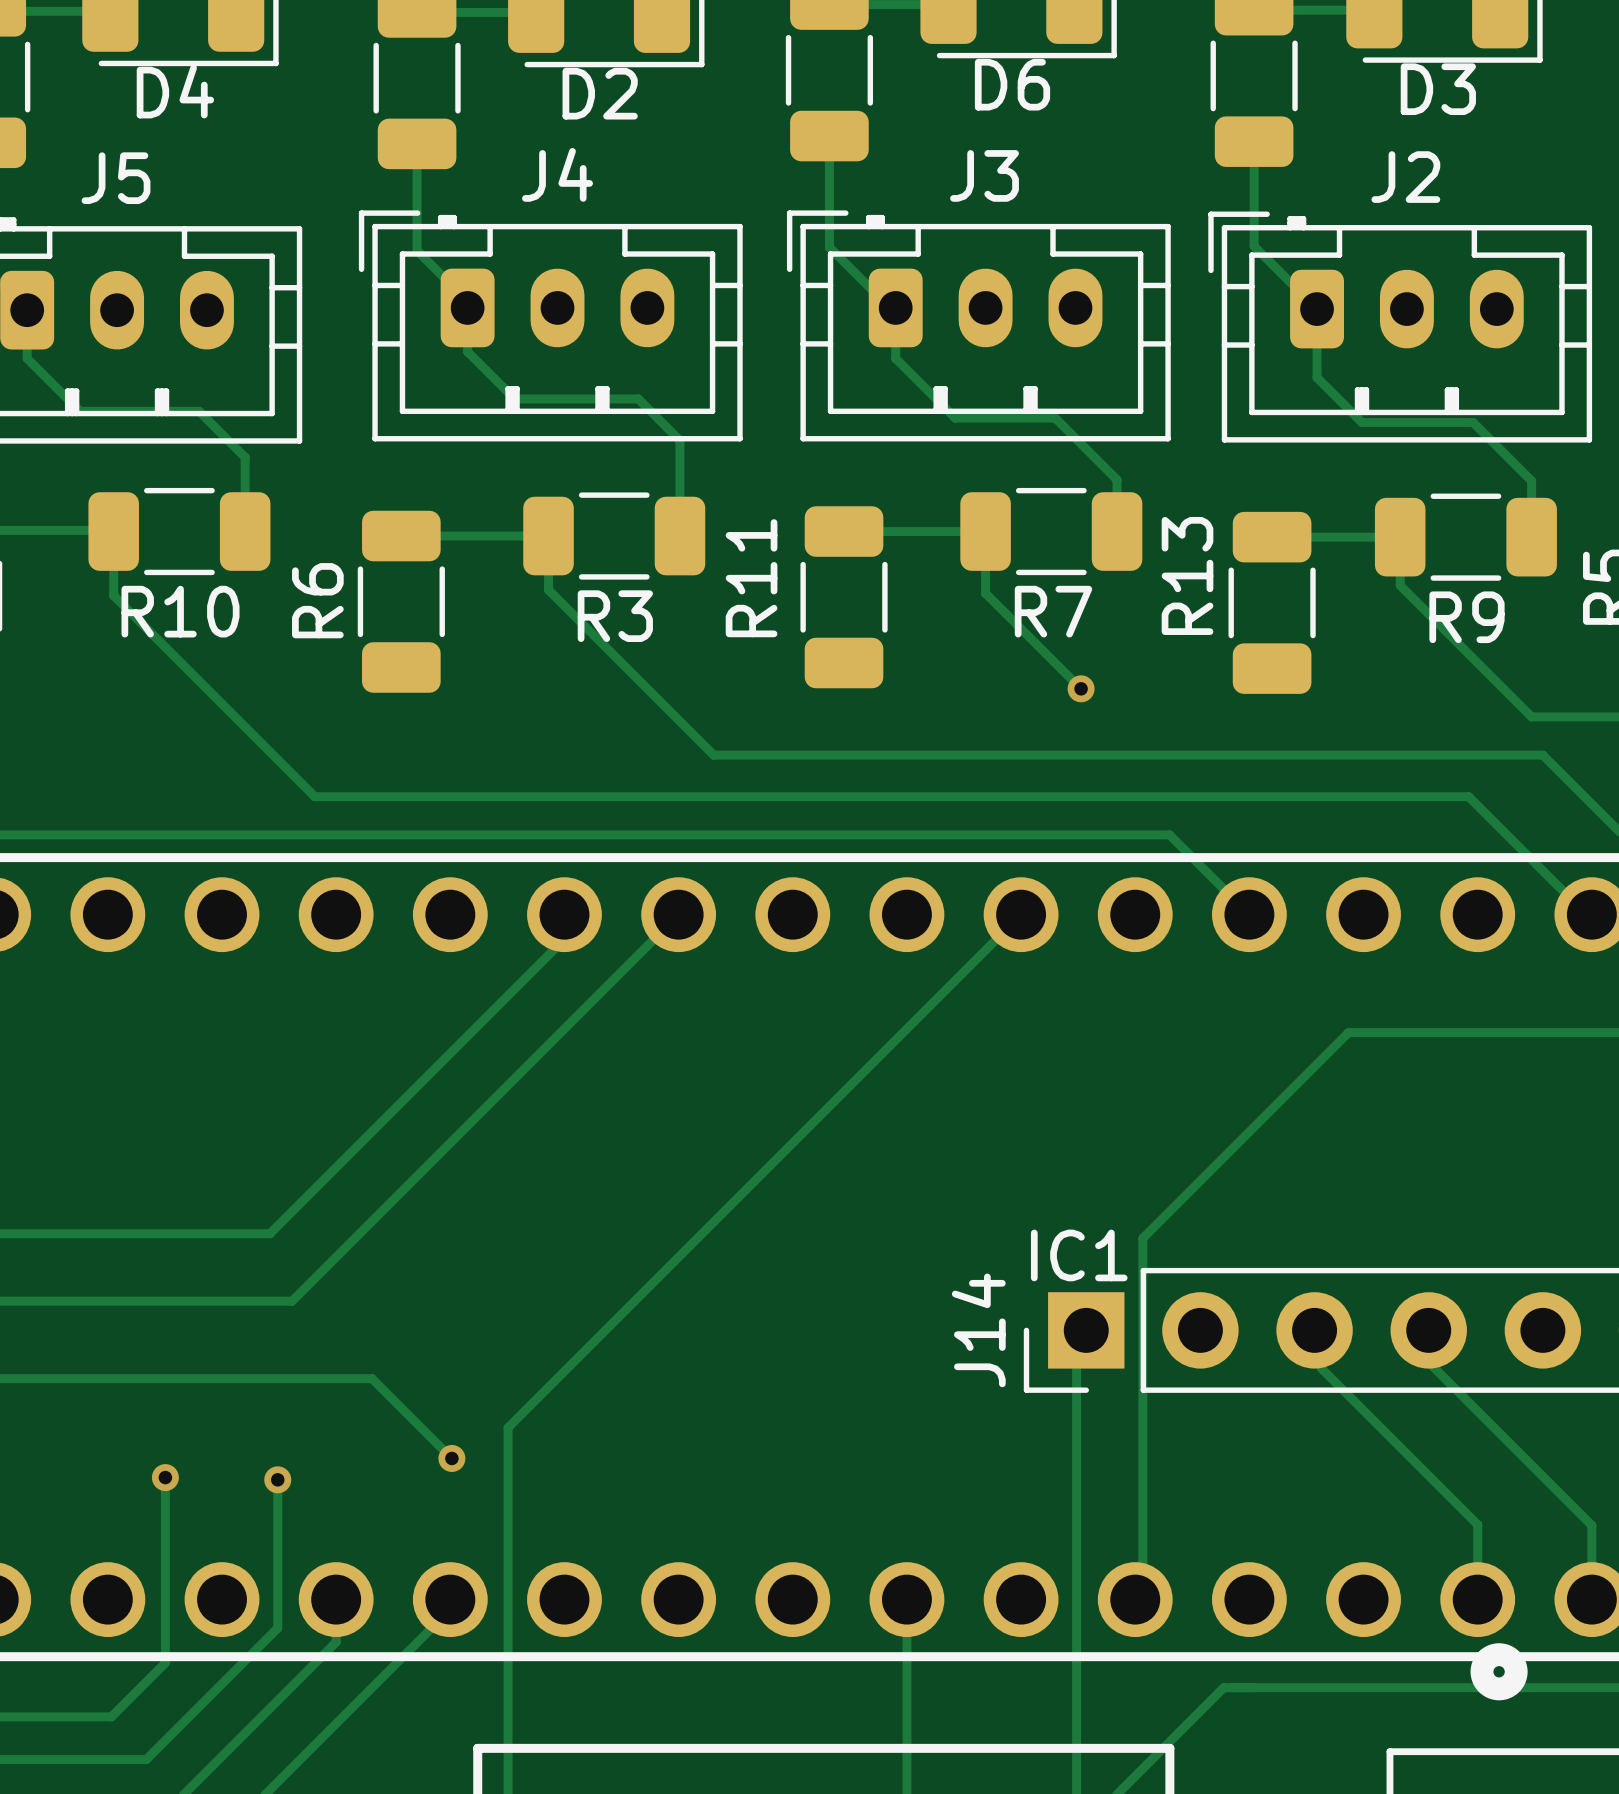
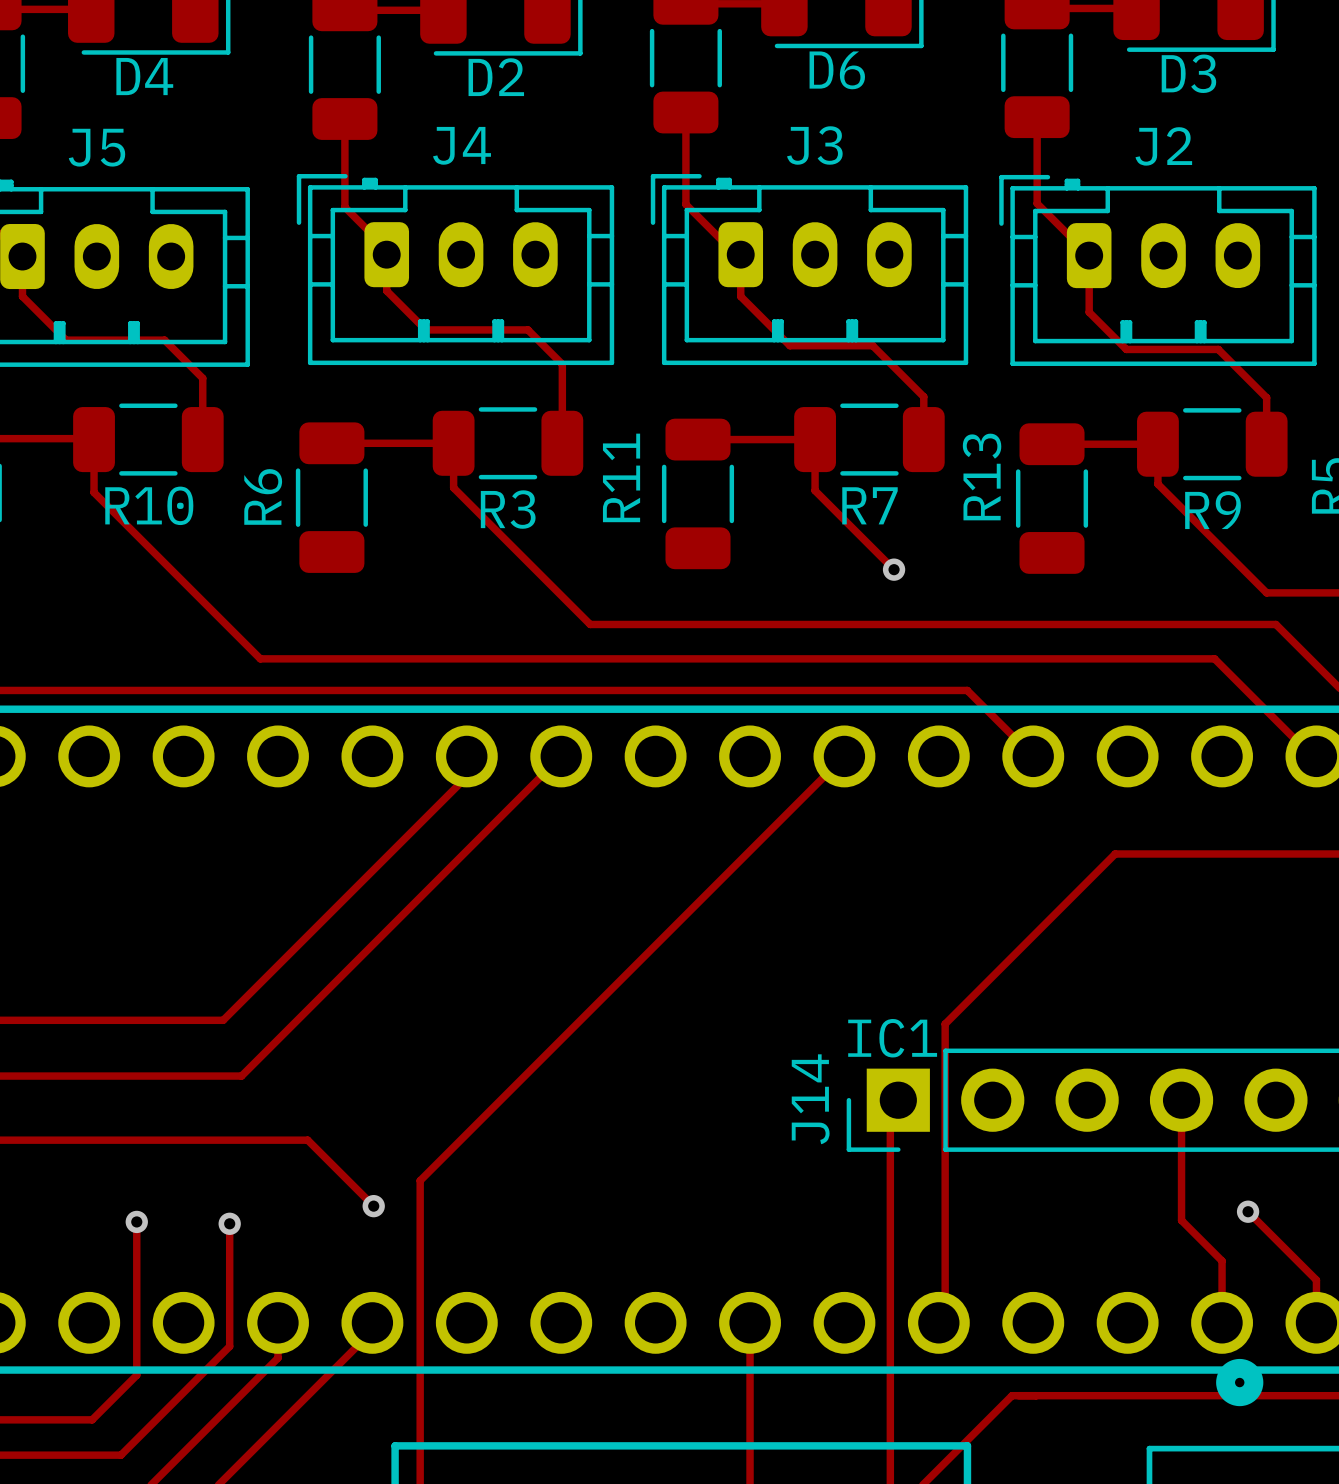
track: (1321, 1337) (1321, 1368) (1428, 1475) -> (1181, 1126) (1181, 1220)
track: (1428, 1362) (1591, 1525) (1591, 1547) -> (1248, 1211) (1316, 1280)
via: none -> (1248, 1211)

